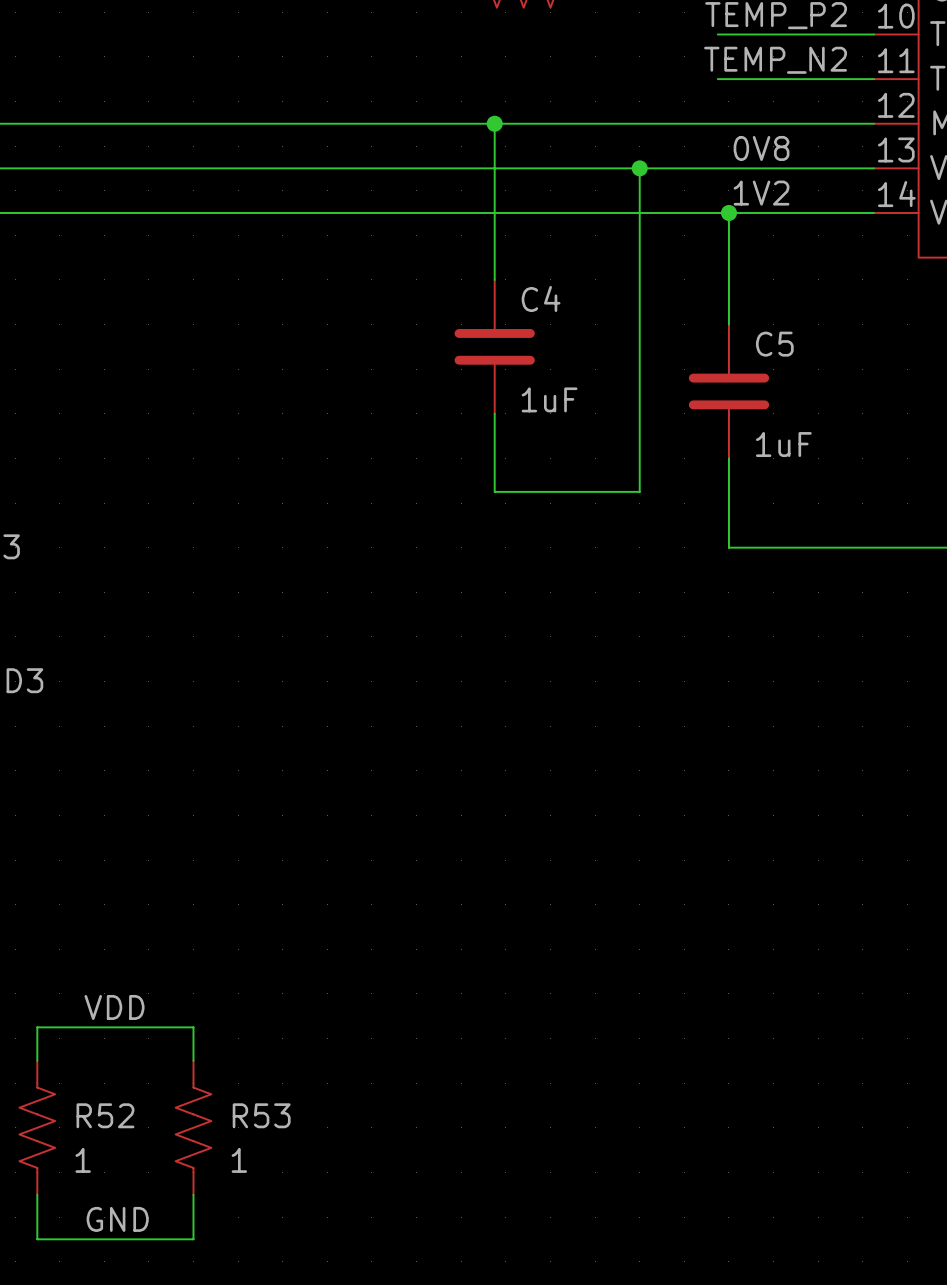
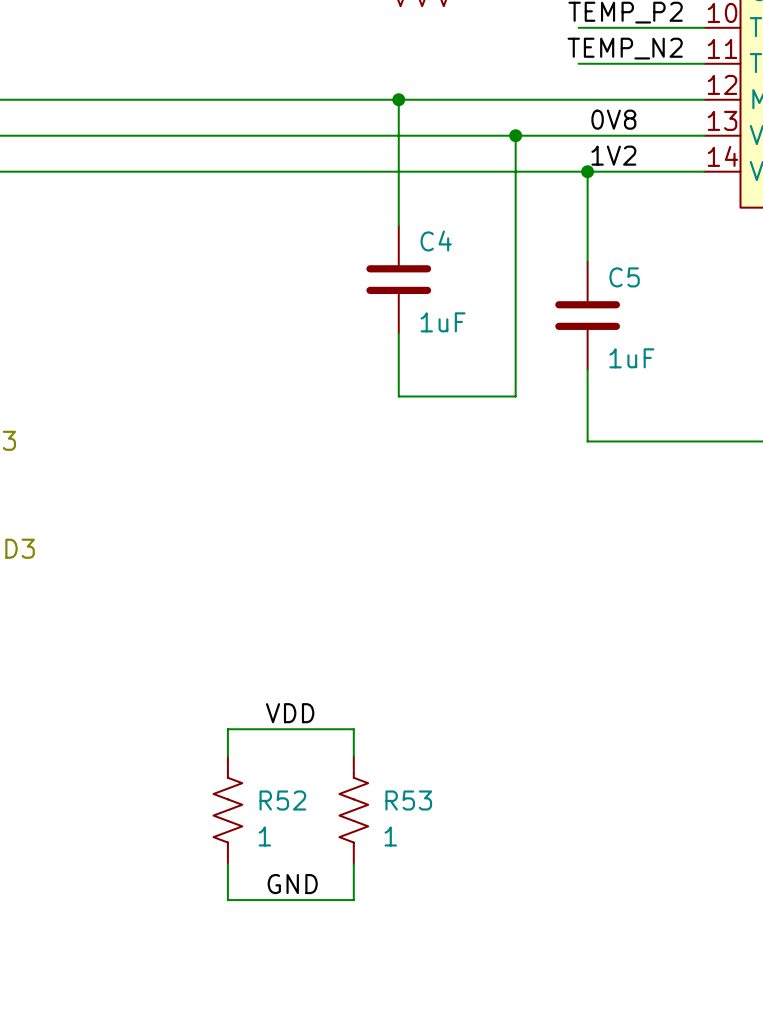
label position: VDD (114, 1007) -> VDD (290, 713)
wire: (37, 1060) (37, 1027) (193, 1027) (193, 1060) -> (227, 756) (227, 729) (353, 729) (353, 756)
R52 position: (37, 1127) -> (227, 810)
R53 position: (193, 1127) -> (353, 810)
wire: (37, 1194) (37, 1239) (193, 1239) (193, 1194) -> (227, 864) (227, 900) (353, 900) (353, 864)
label position: GND (117, 1219) -> GND (292, 884)

